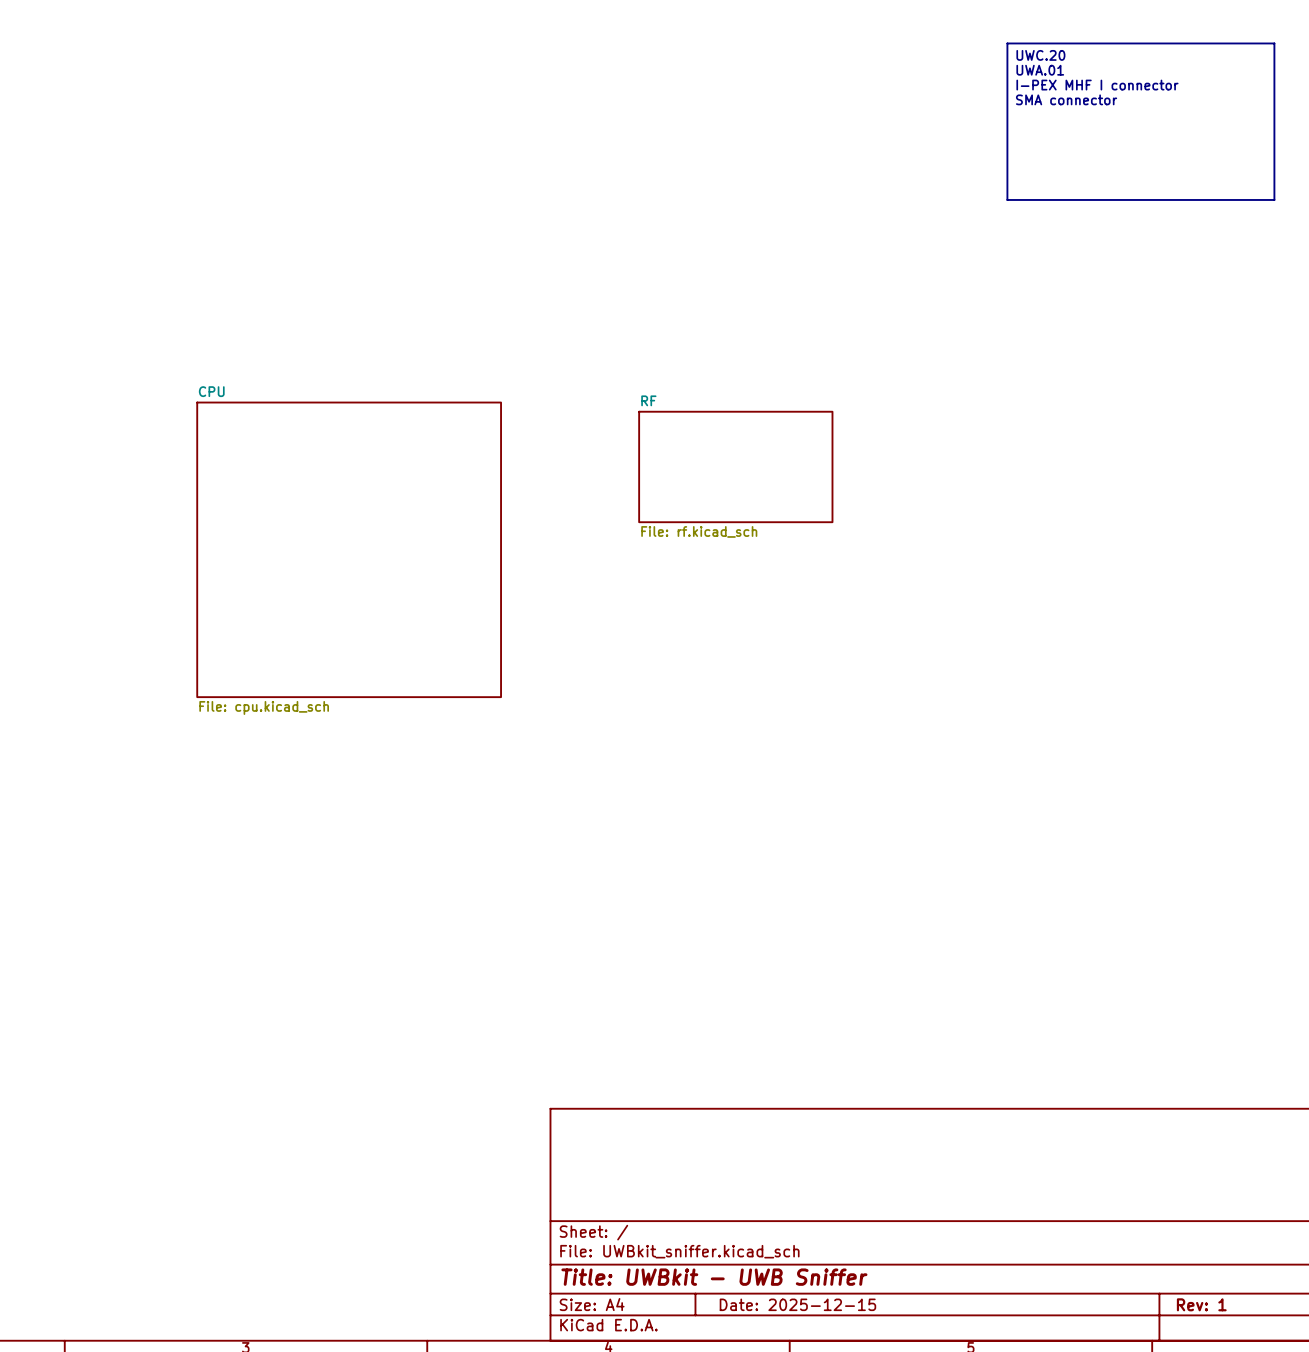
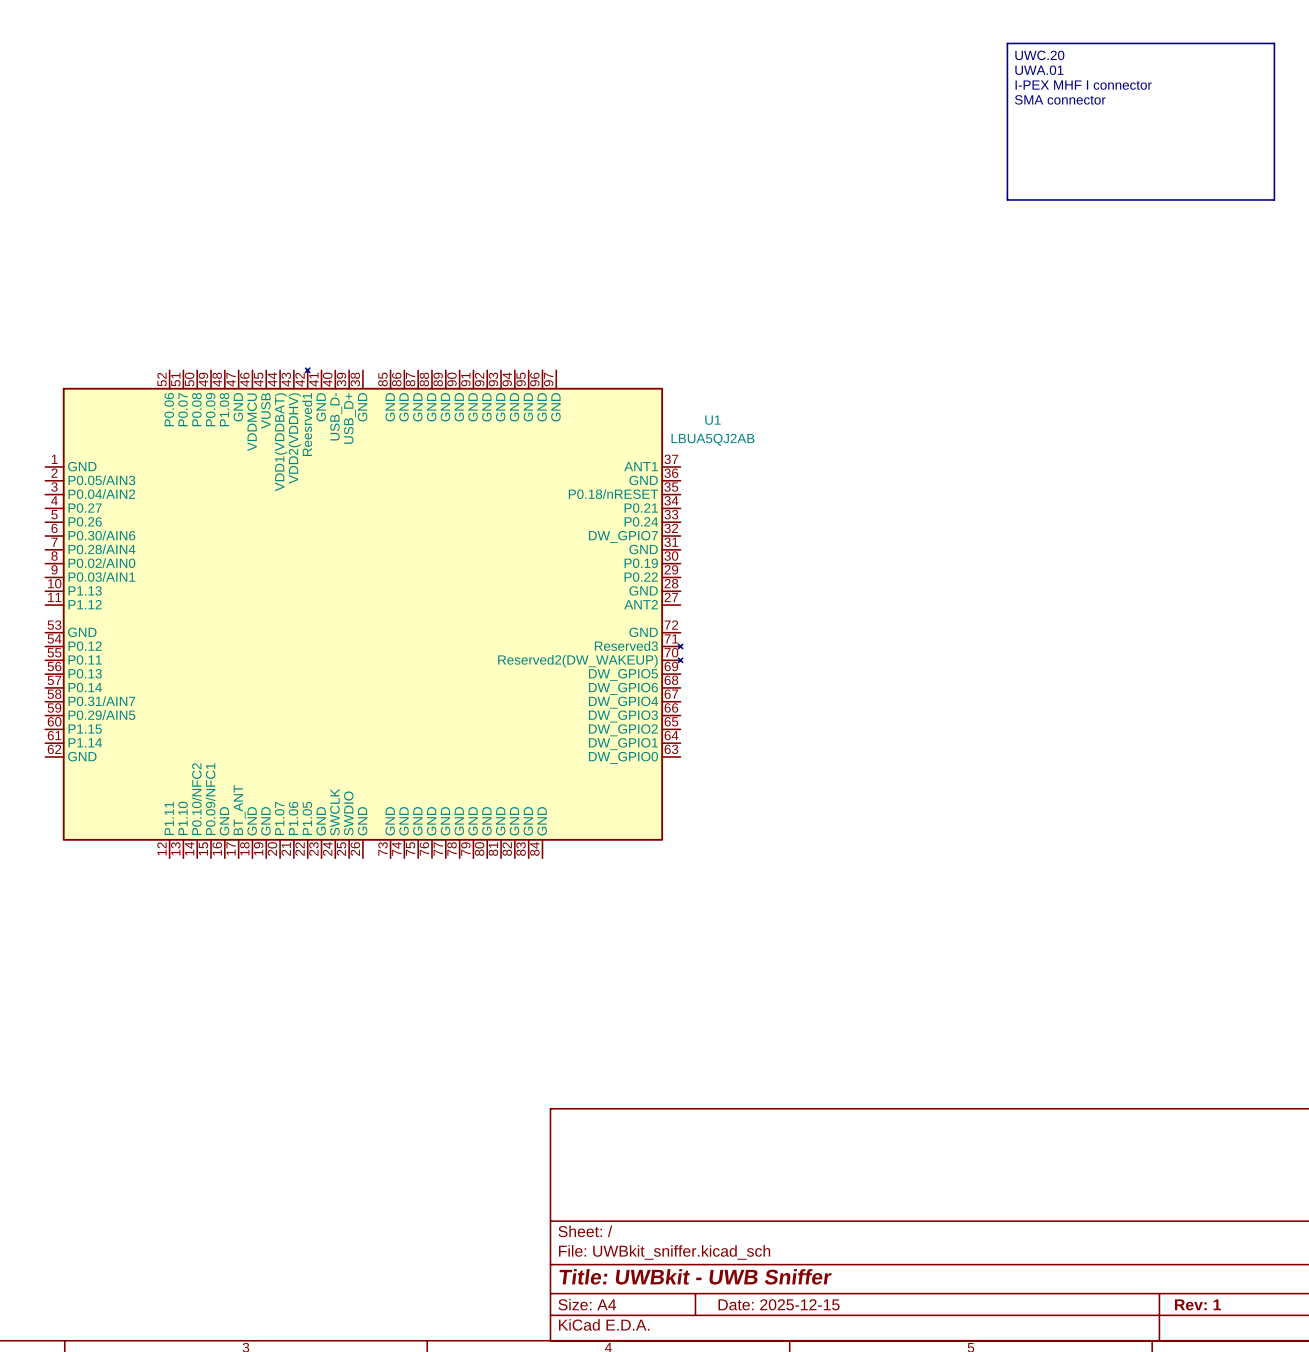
sheet RF: File: rf.kicad_sch (735, 466) -> none
sheet CPU: File: cpu.kicad_sch (349, 549) -> none
U1: none -> LBUA5QJ2AB (364, 613)

